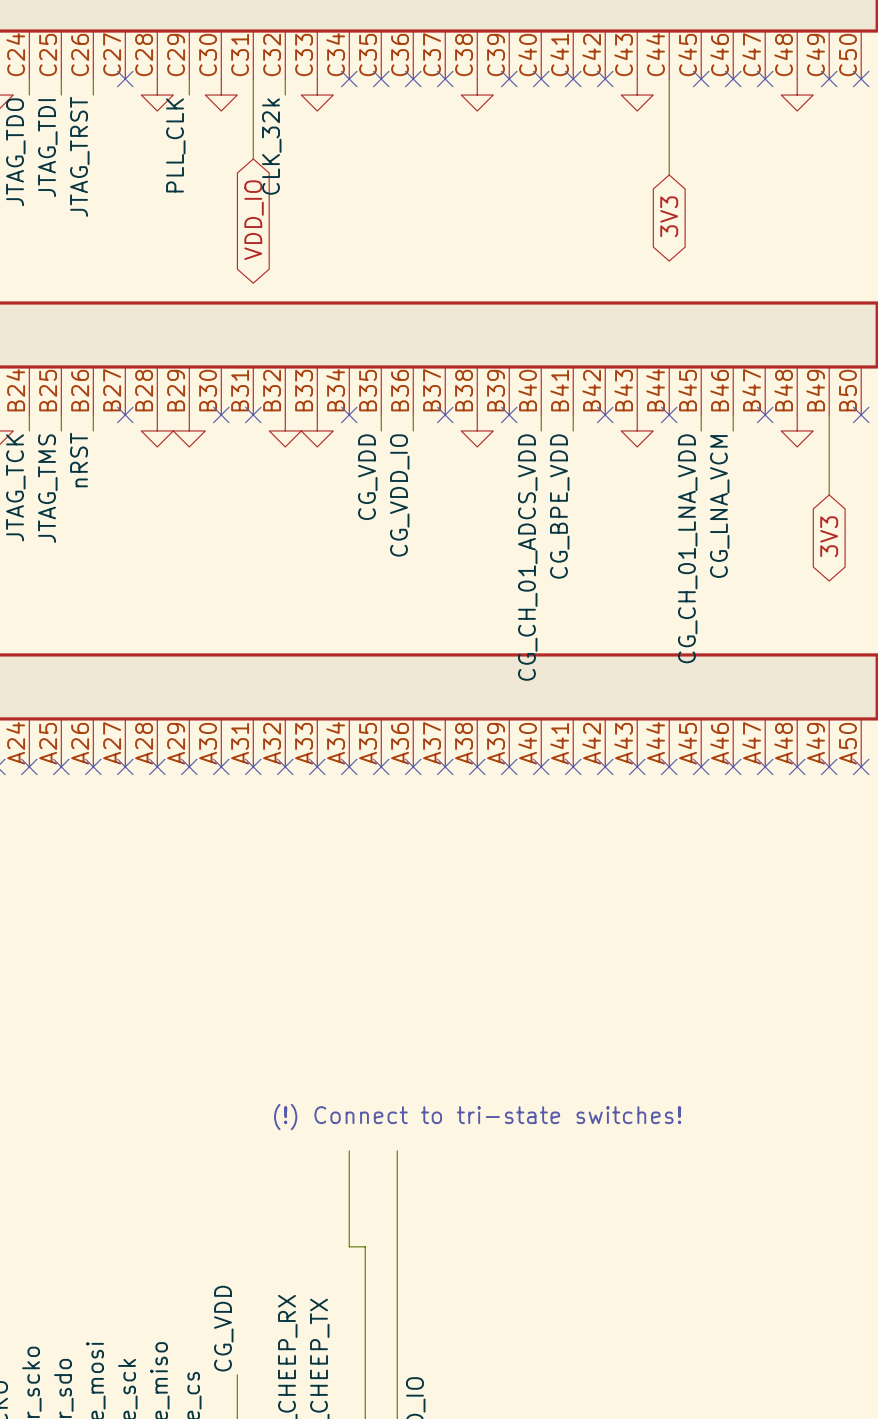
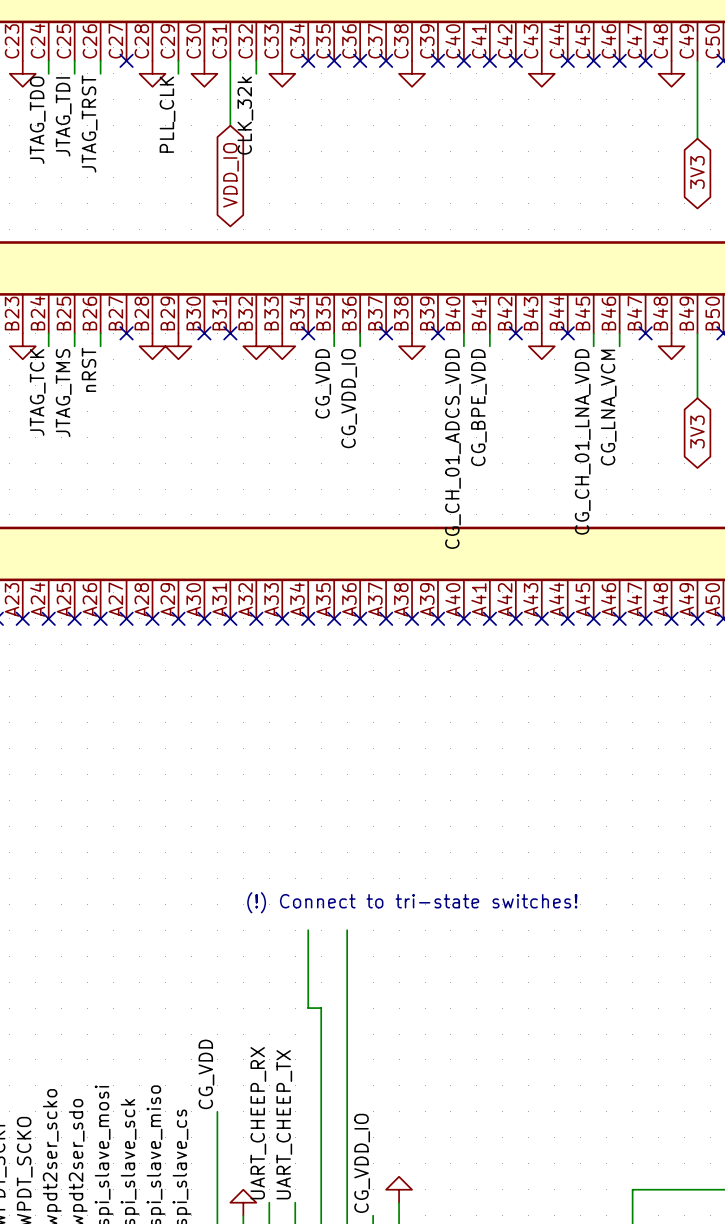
wire: (669, 79) (669, 175) -> (697, 60) (697, 138)
no-connect mark: none -> (567, 60)
no-connect mark: (829, 79) -> none
global label position: 3V3 (669, 216) -> 3V3 (697, 172)

